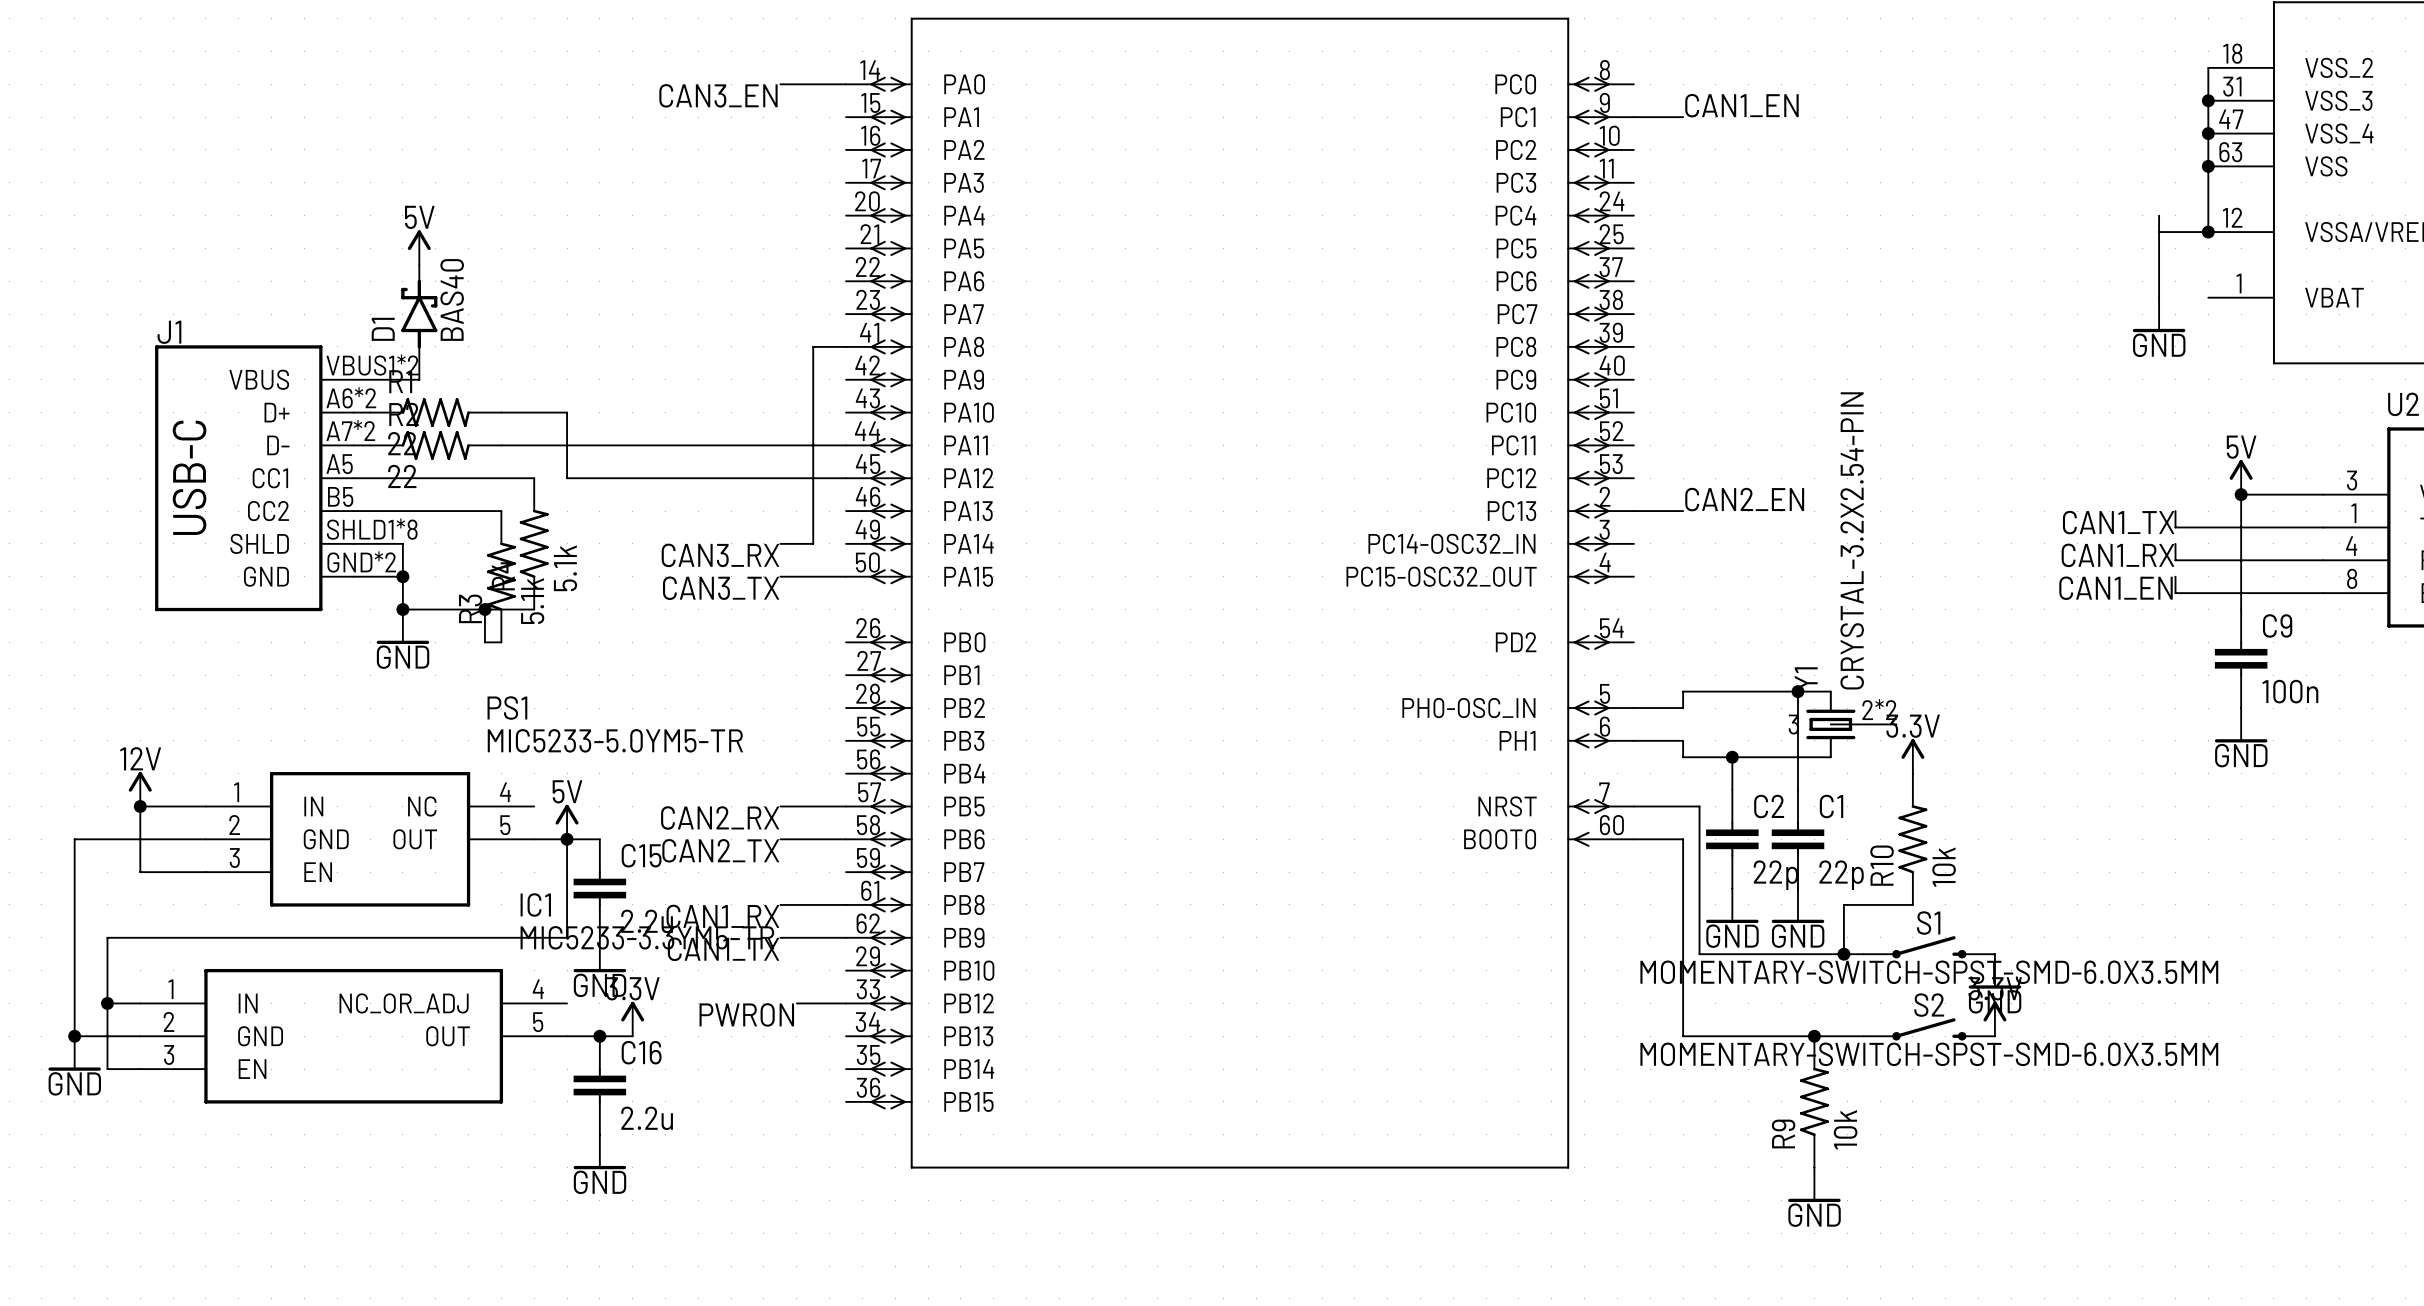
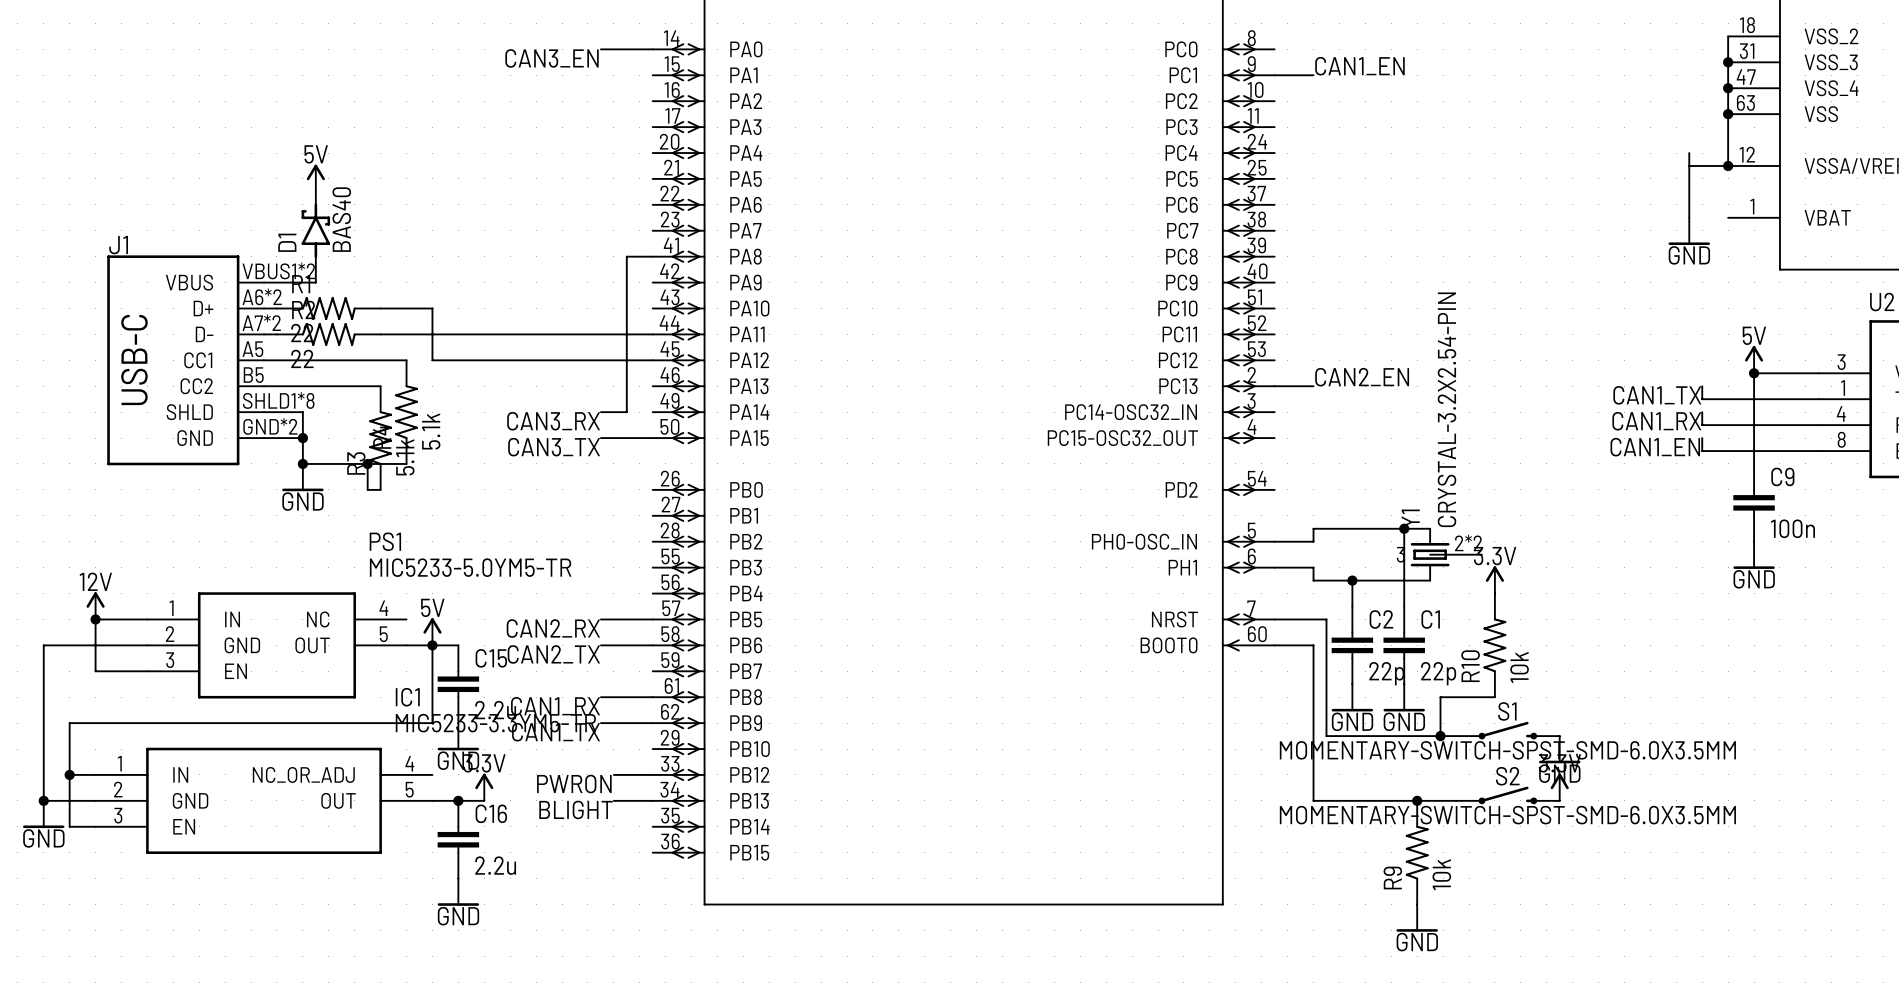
wire: none -> (613, 800) (652, 800)
label: none -> BLIGHT (576, 809)

